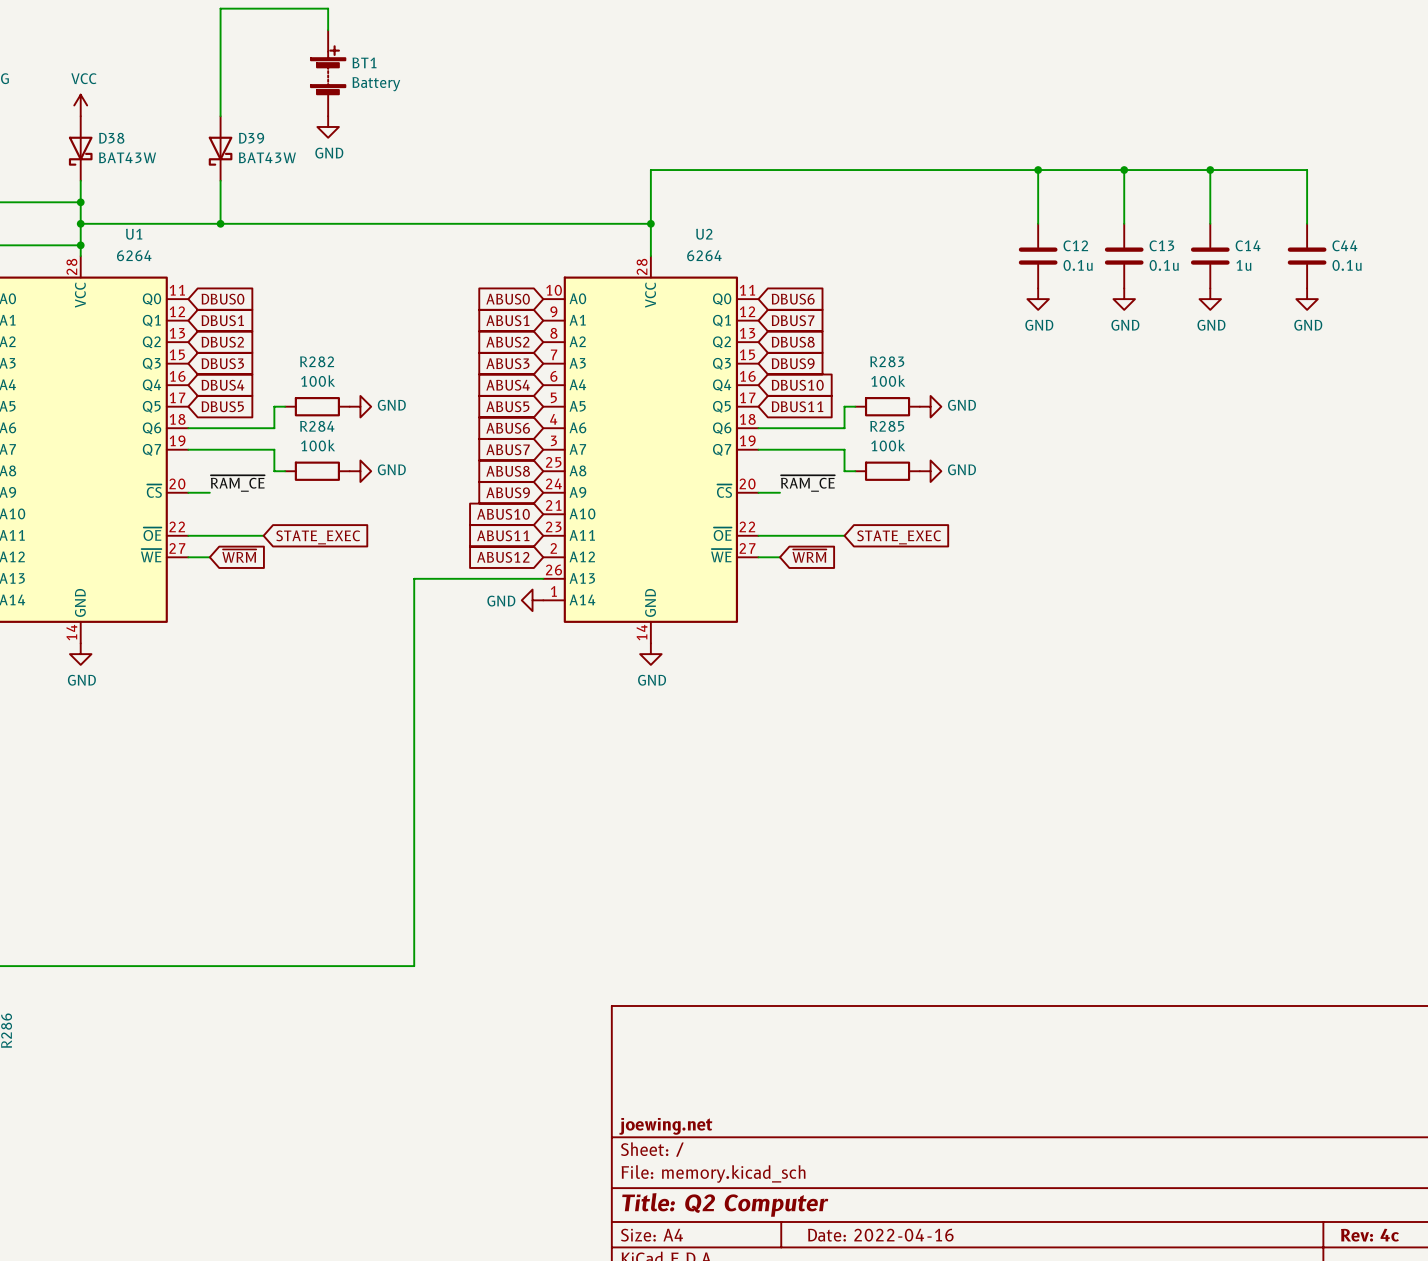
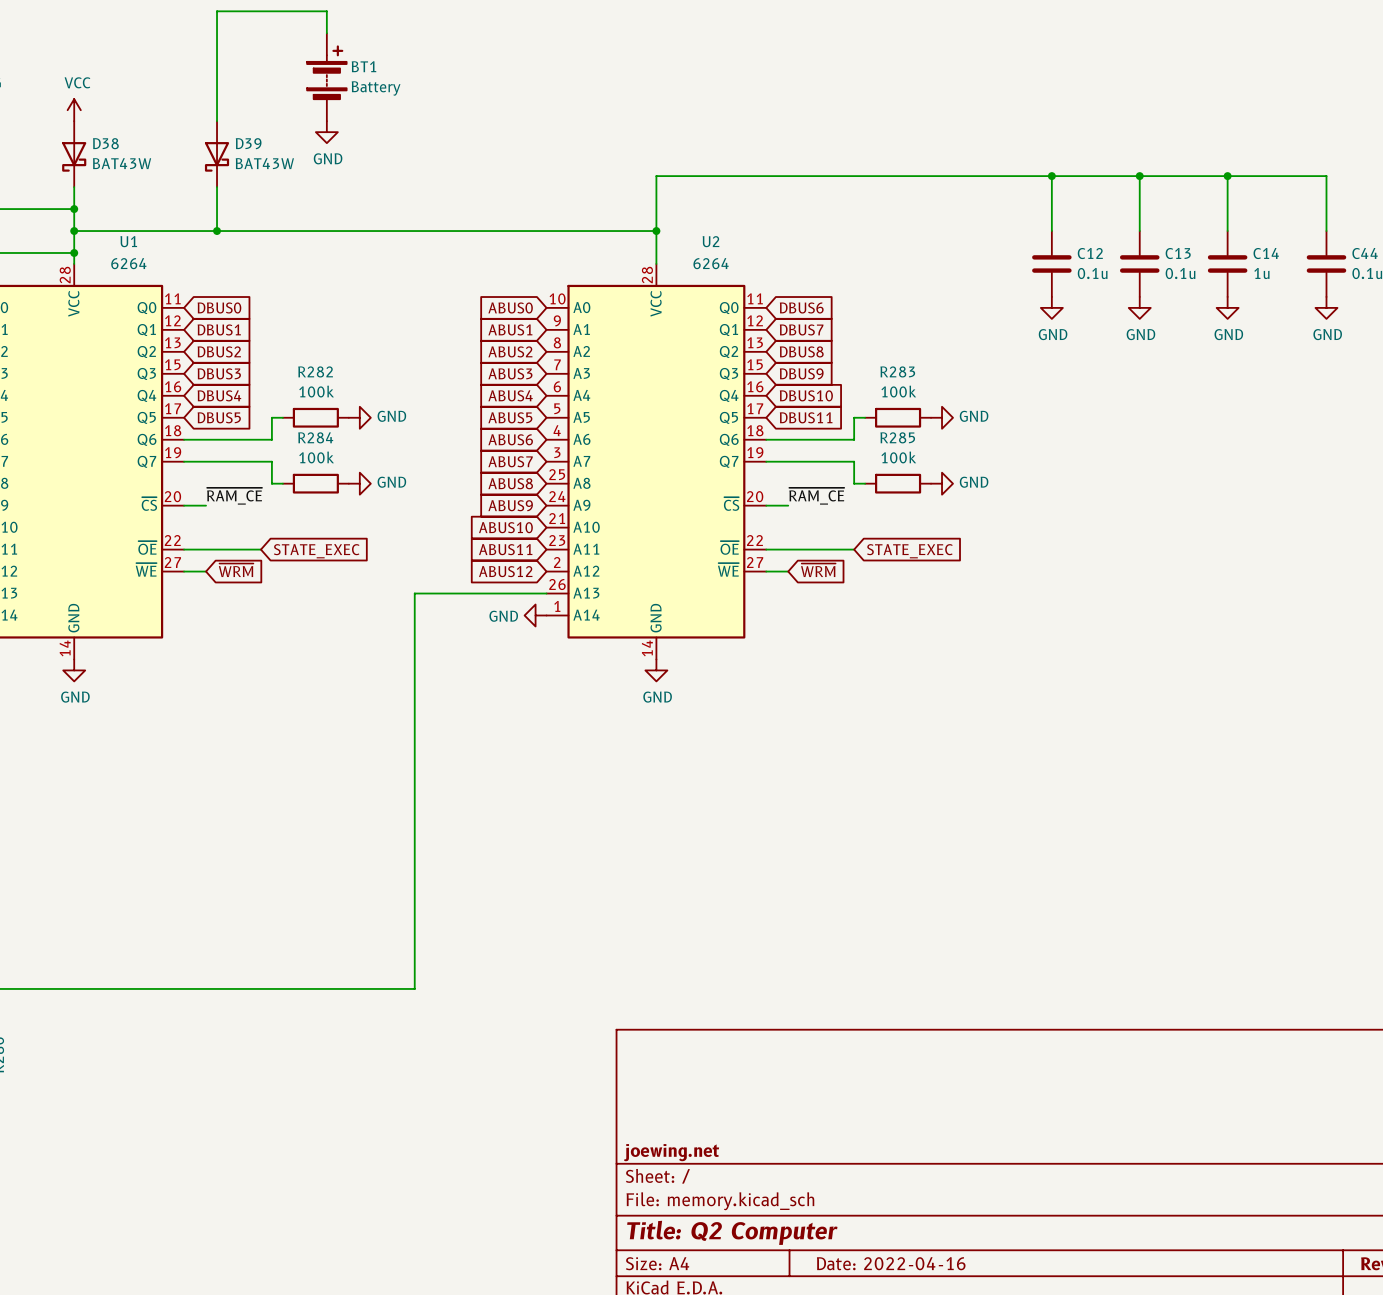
BT1 symbol: [310, 30, 346, 117] -> [307, 33, 347, 122]

